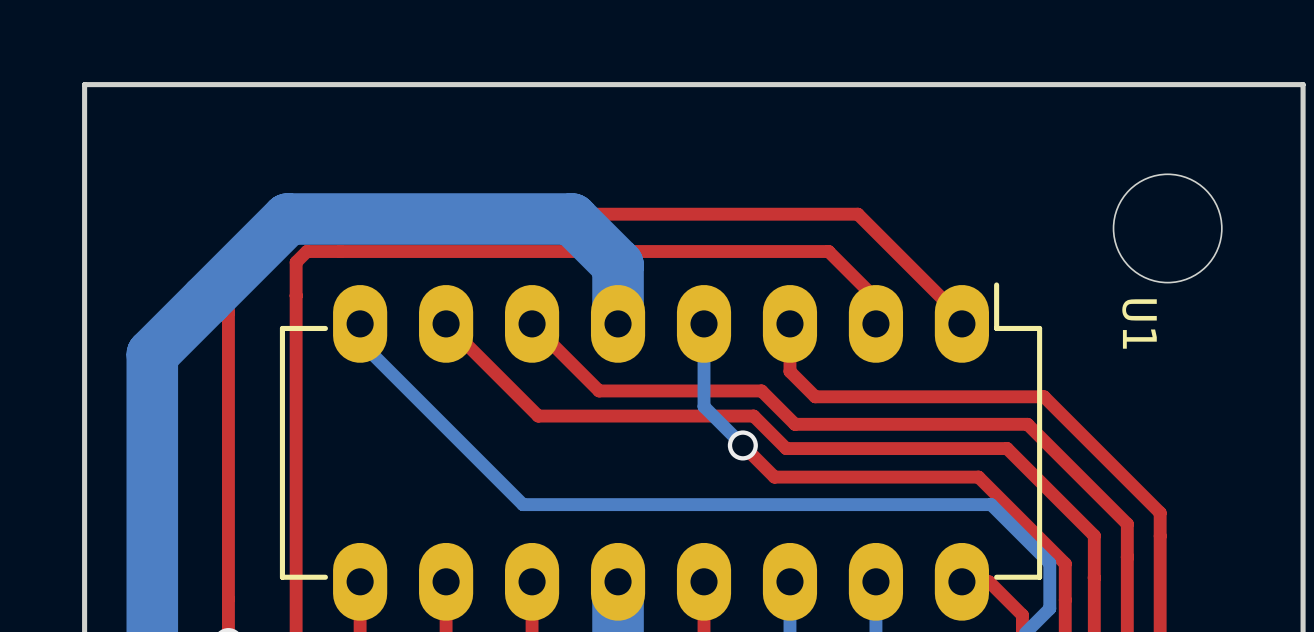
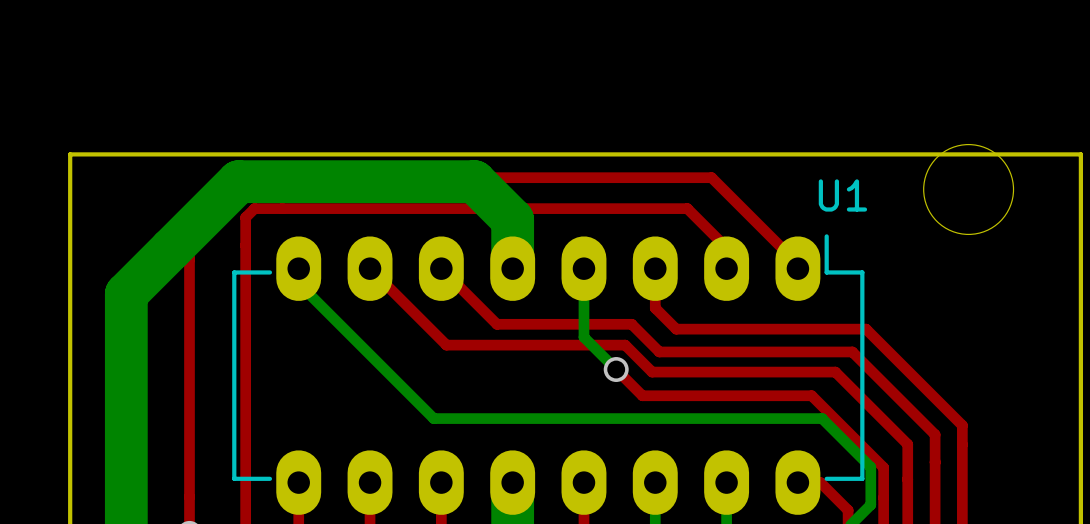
board edge: (1303, 186) (1303, 84) (84, 84) (84, 186) -> (1080, 154) (70, 154)
U1 name rotation: 0° (1139, 323) -> 90° counterclockwise (842, 195)
U1 name position: U1 (1139, 323) -> U1 (842, 195)

